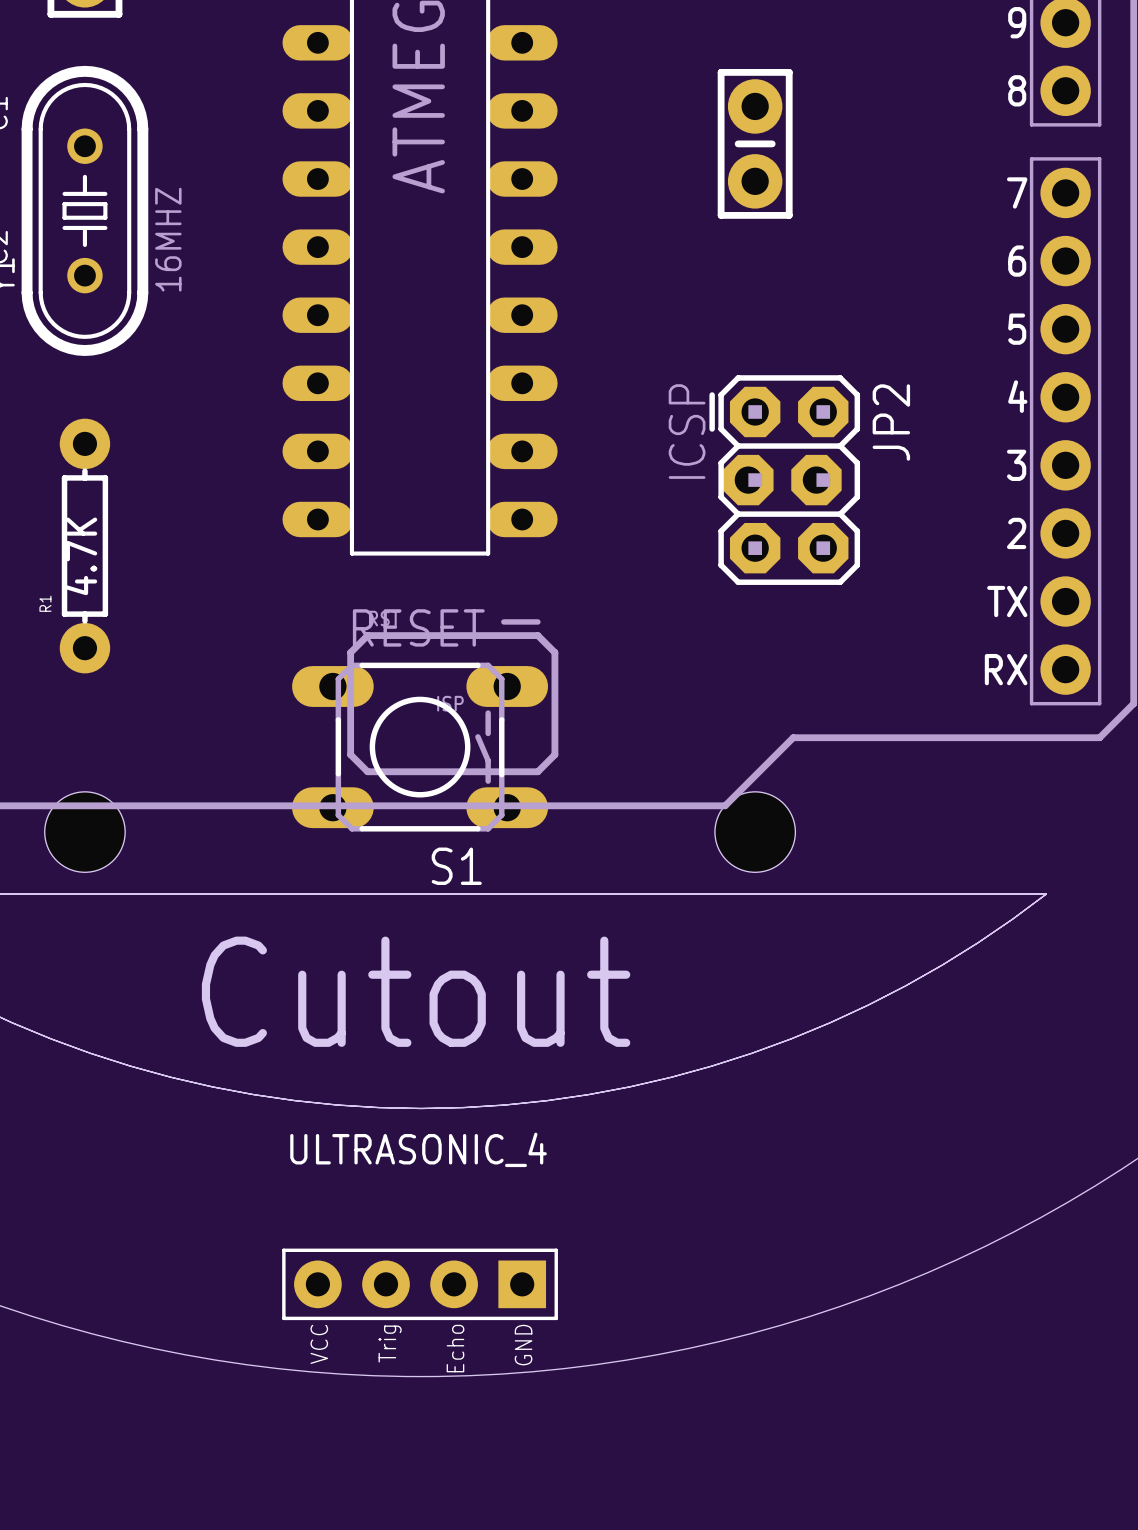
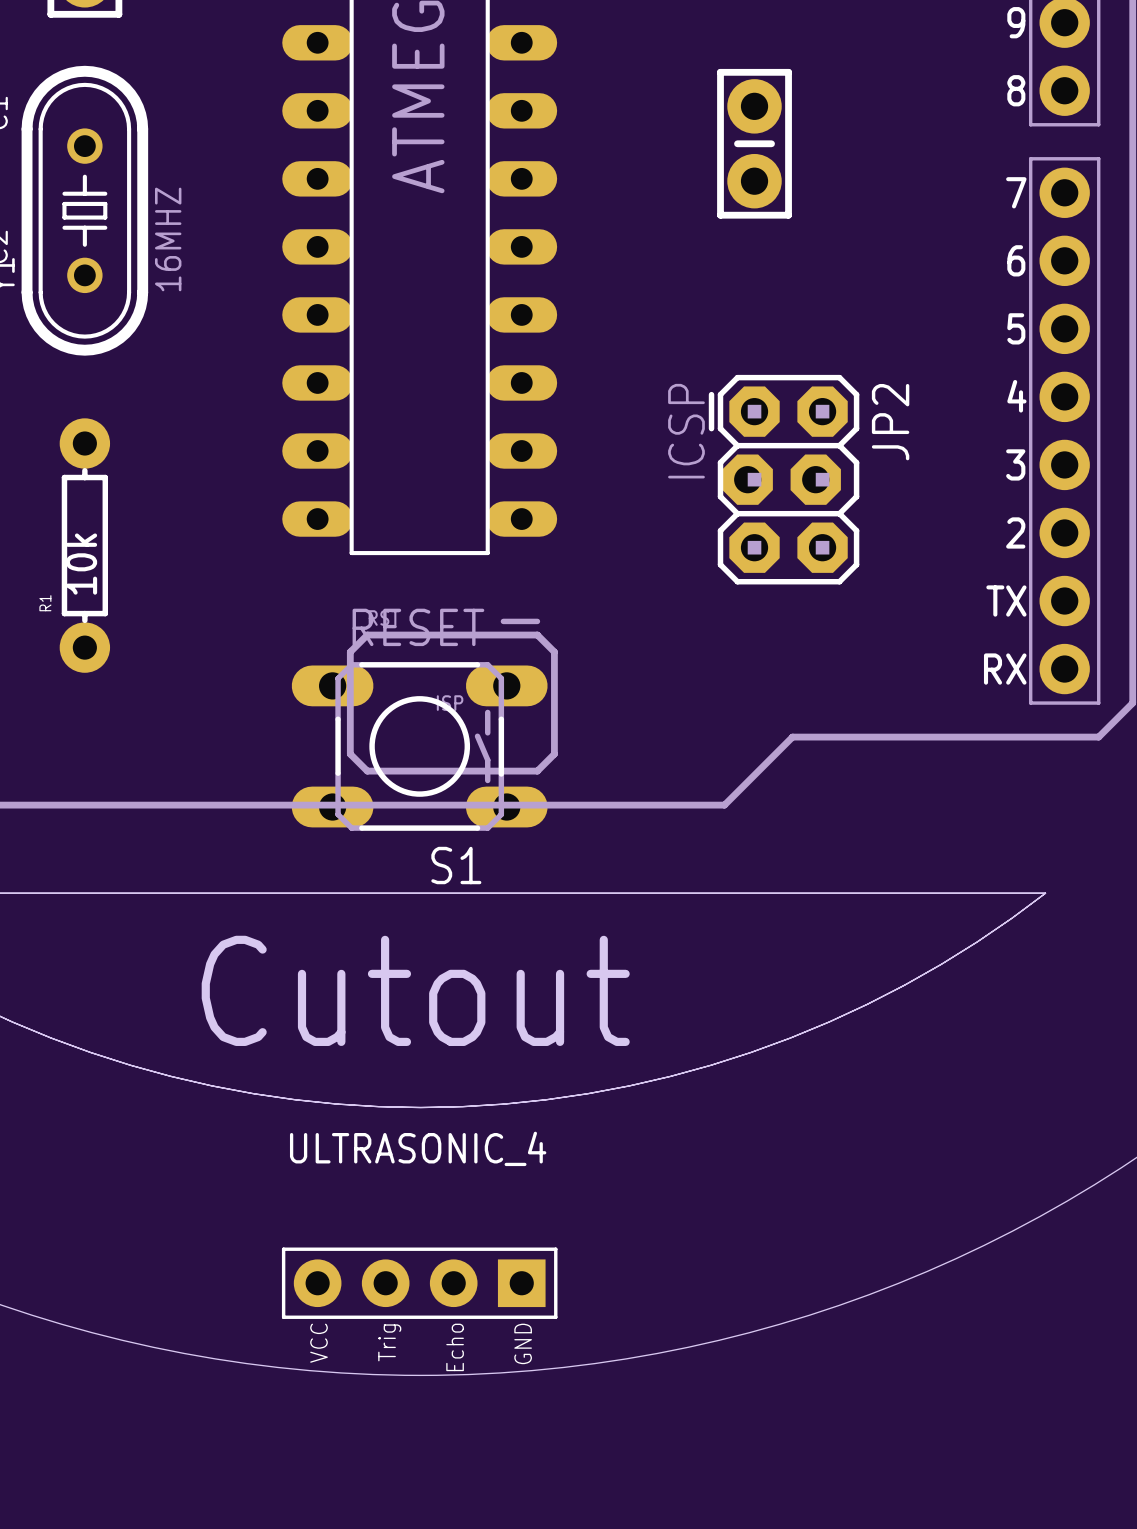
R1 value: 4.7K (80, 556) -> 10k (81, 564)
hole: (84, 832) -> none
hole: (755, 832) -> none

